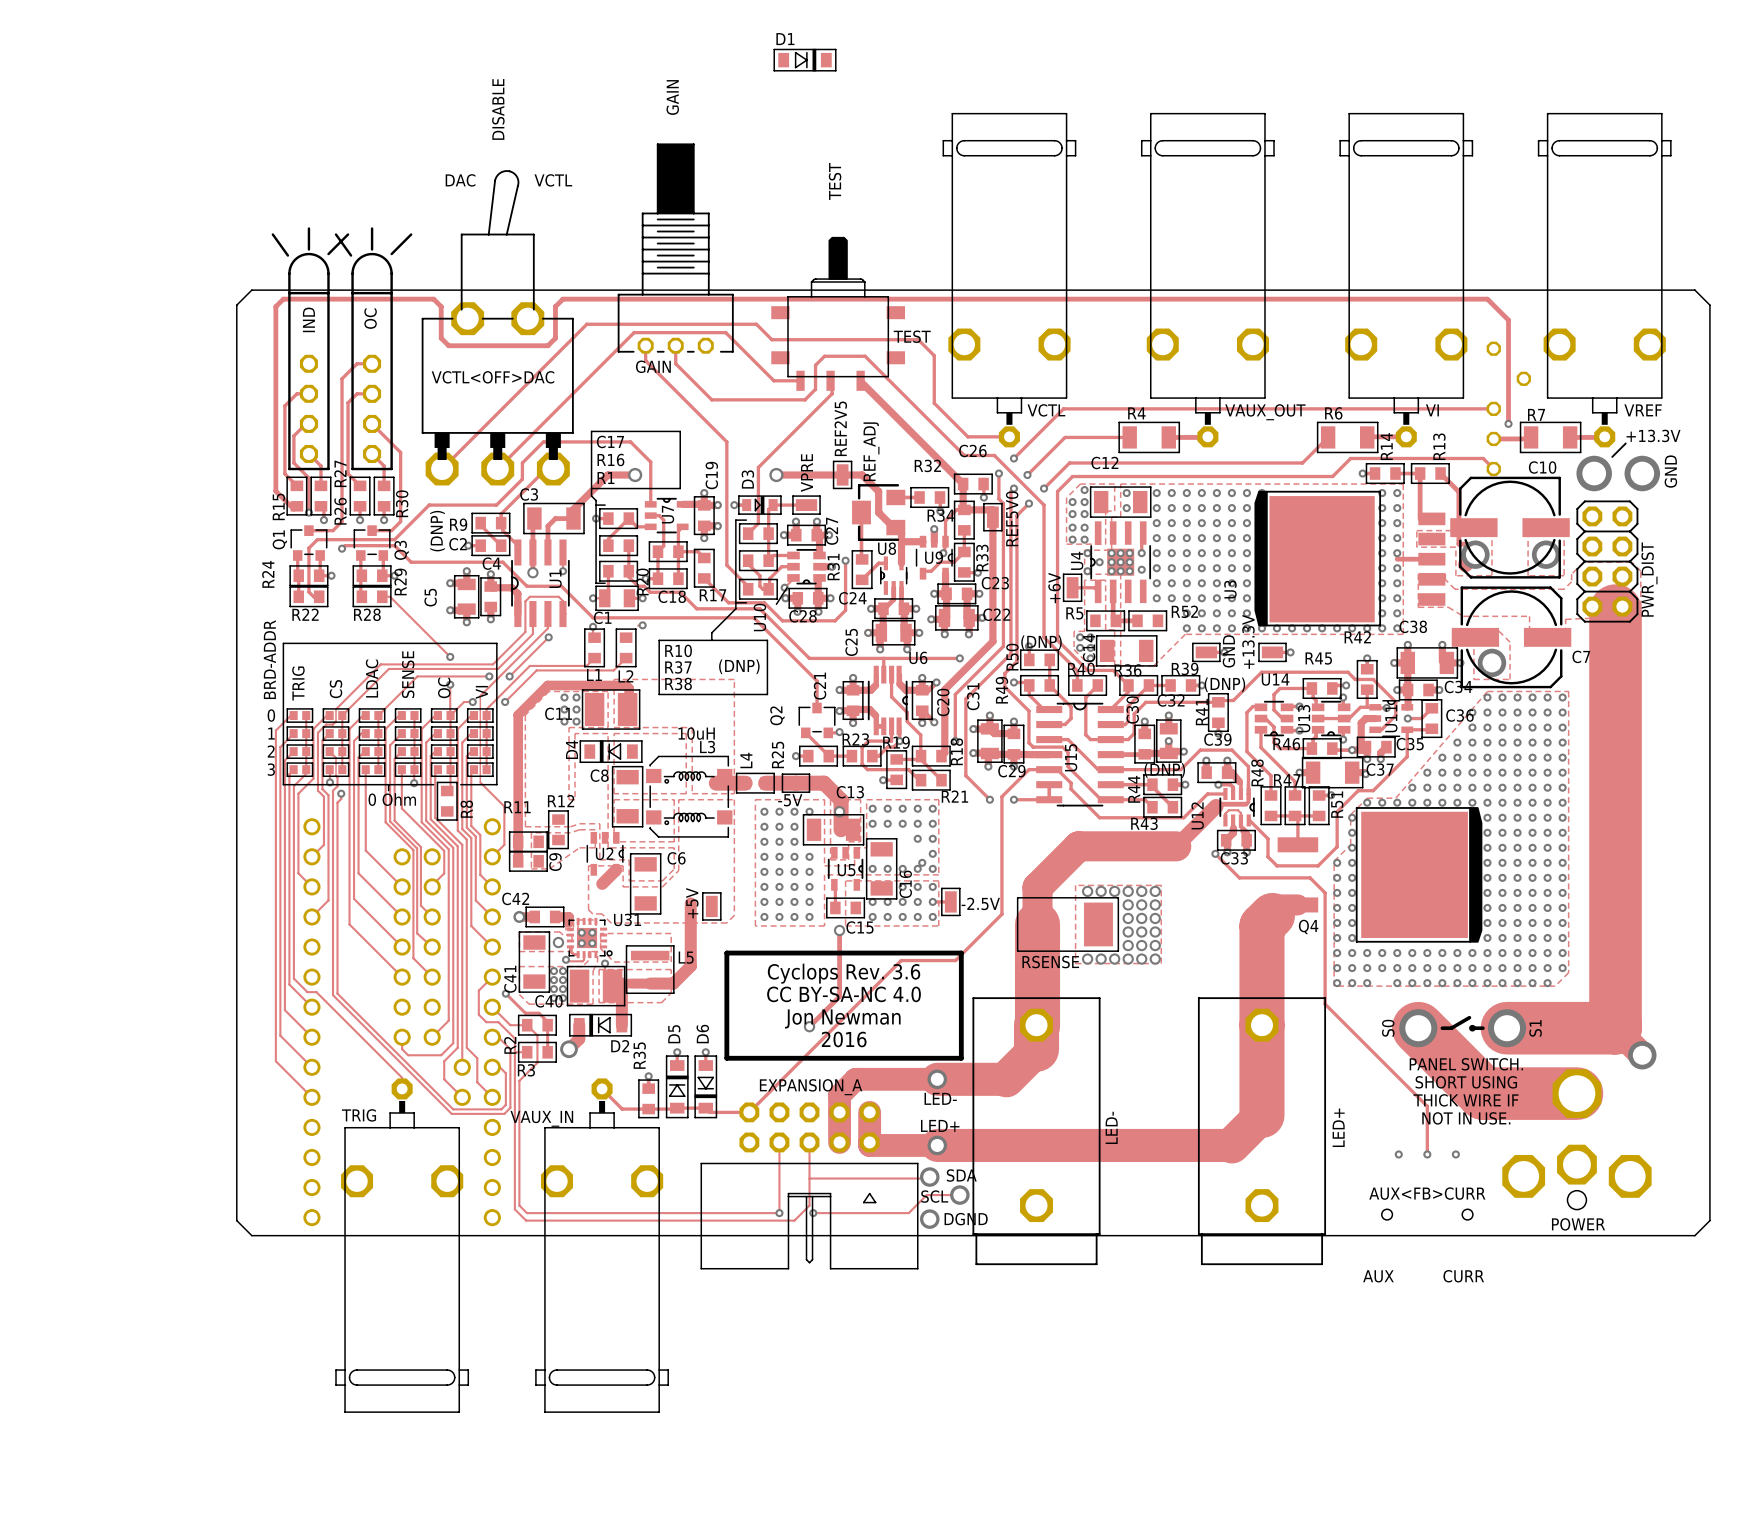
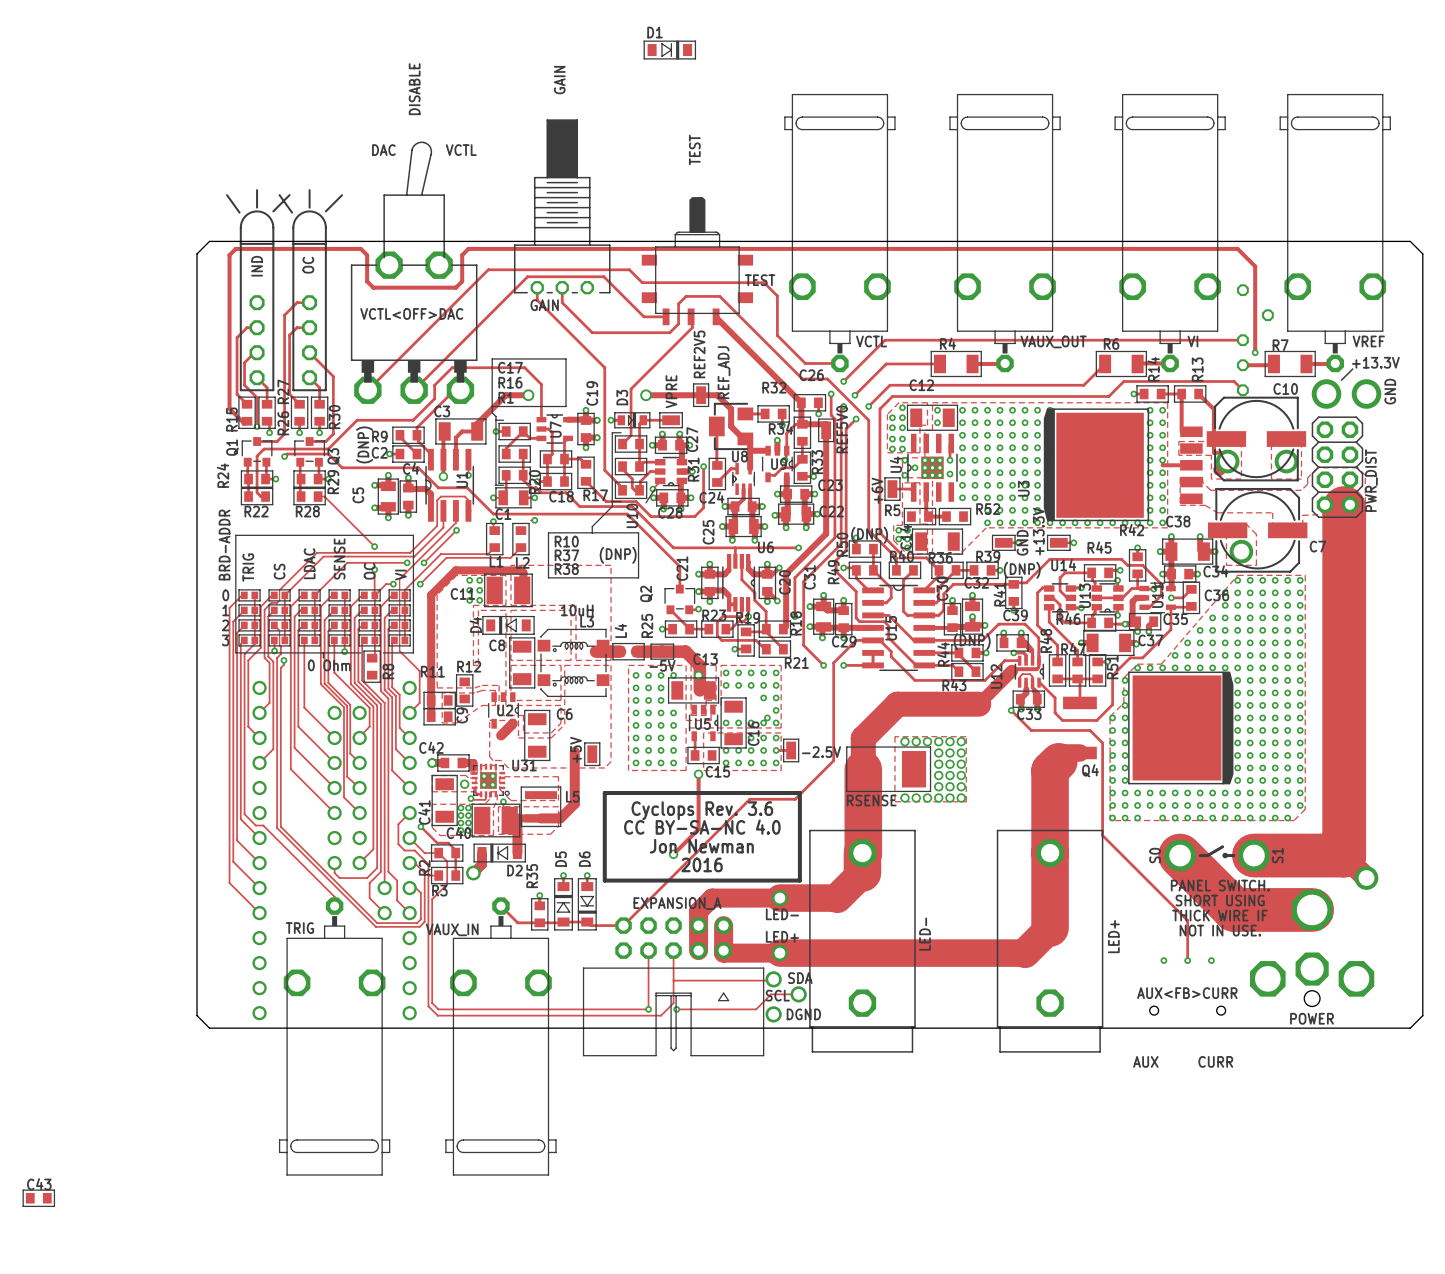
C43: none -> (38, 1198)

